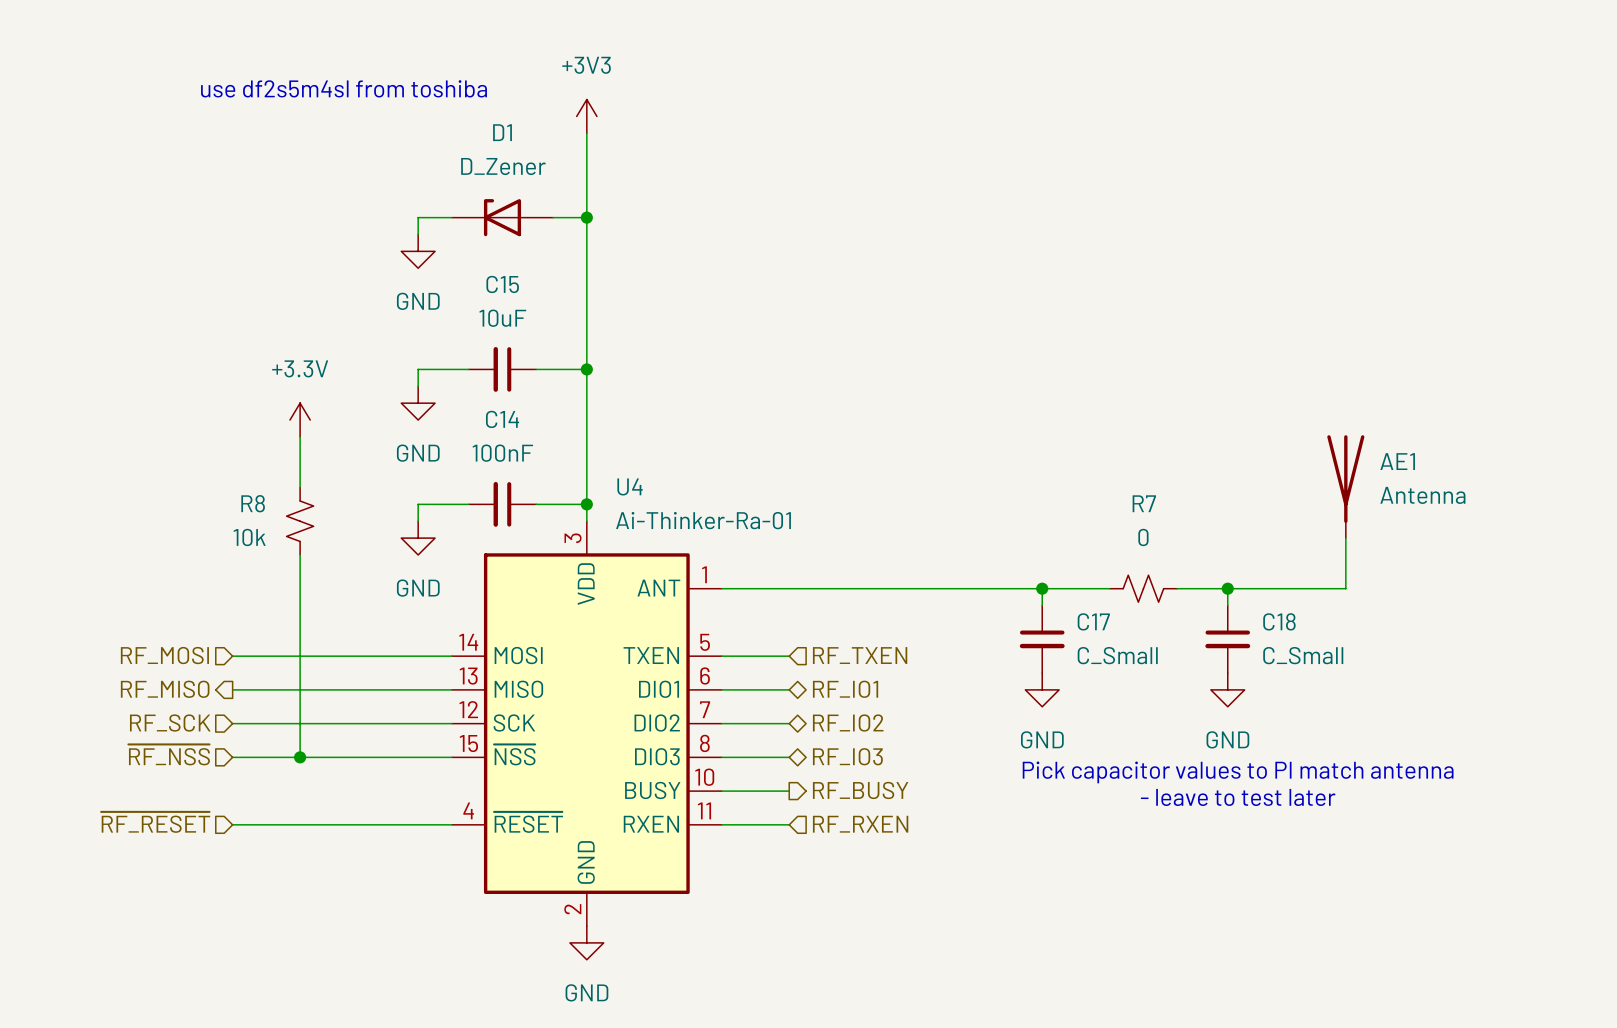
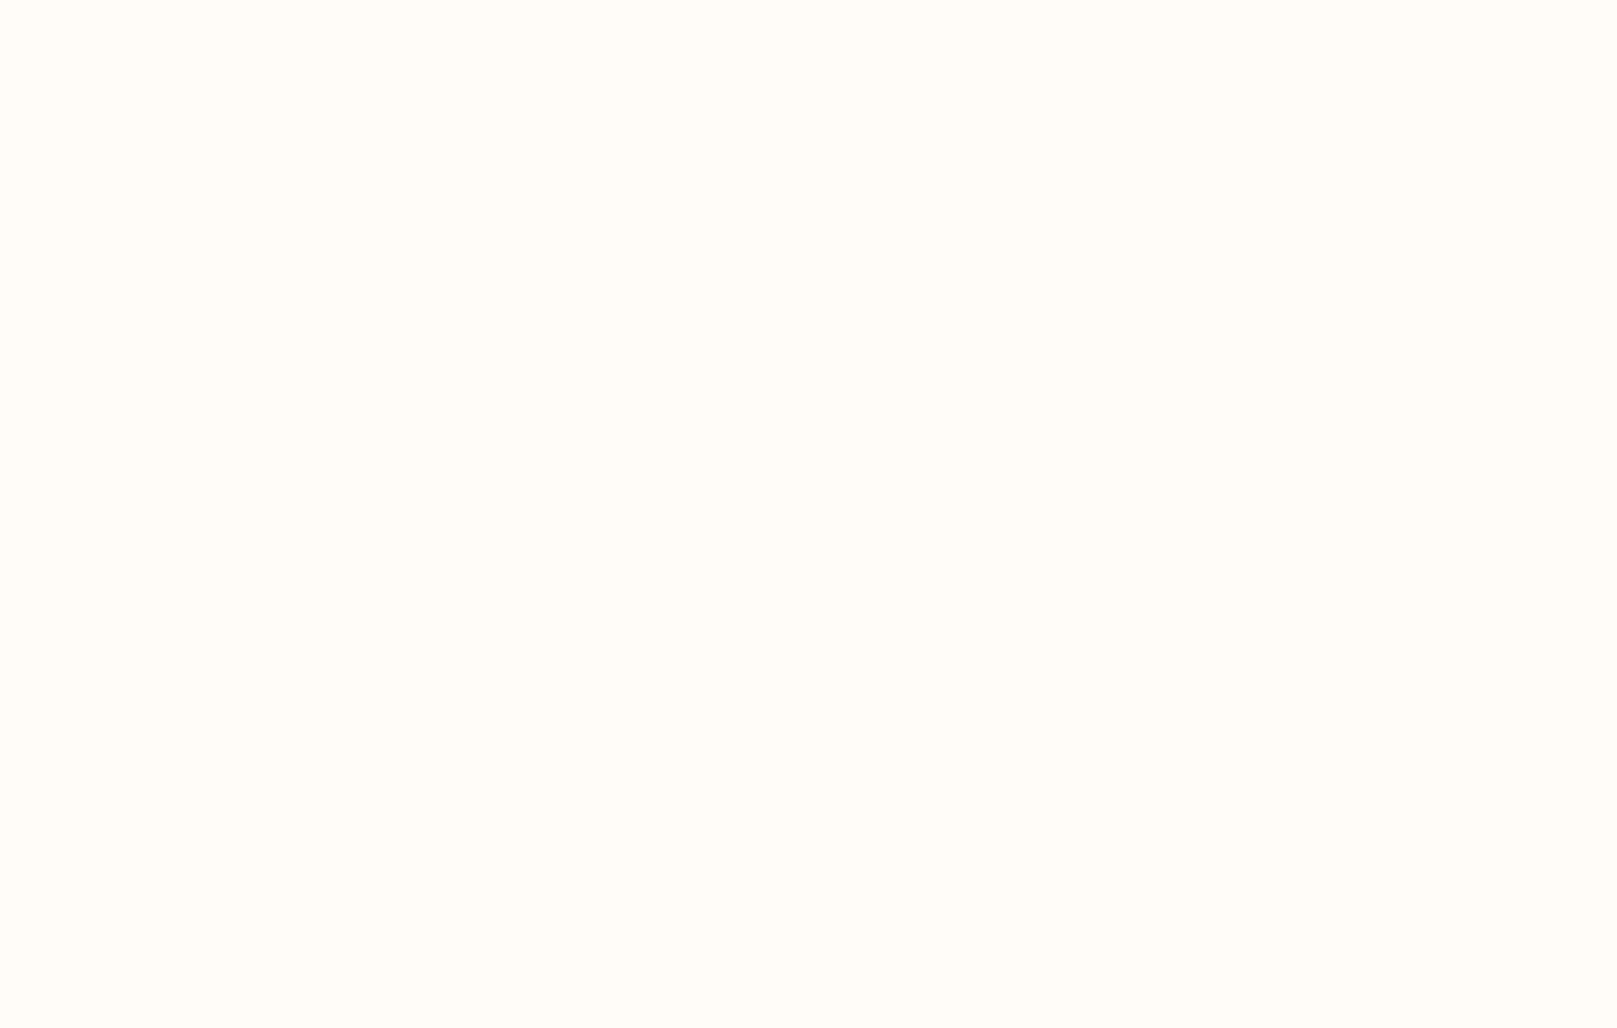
text: use df2s5m4sl from toshiba (344, 88) -> none
power symbol: +3V3 (586, 116) -> none
wire: (586, 133) (586, 521) -> none
wire: (451, 217) (418, 217) (418, 234) -> none
D1: D_Zener (502, 217) -> none
wire: (553, 217) (586, 217) -> none
junction: (586, 217) -> none
power symbol: GND (418, 251) -> none
wire: (468, 369) (418, 369) (418, 386) -> none
C15: 10uF (502, 369) -> none
wire: (536, 369) (586, 369) -> none
junction: (586, 369) -> none
power symbol: GND (418, 403) -> none
power symbol: +3.3V (300, 420) -> none
wire: (300, 436) (300, 487) -> none
AE1: Antenna (1345, 486) -> none
wire: (468, 504) (418, 504) (418, 521) -> none
C14: 100nF (502, 504) -> none
wire: (536, 504) (586, 504) -> none
junction: (586, 504) -> none
R8: 10k (300, 521) -> none
power symbol: GND (418, 538) -> none
wire: (1345, 538) (1345, 588) (1177, 588) -> none
wire: (300, 554) (300, 757) -> none
wire: (721, 588) (1109, 588) -> none
wire: (1042, 588) (1042, 605) -> none
junction: (1042, 588) -> none
R7: 0 (1143, 588) -> none
wire: (1227, 588) (1227, 605) -> none
junction: (1227, 588) -> none
C17: C_Small (1042, 639) -> none
C18: C_Small (1227, 639) -> none
hierarchical label: RF_MOSI (164, 655) -> none
hierarchical label: RF_TXEN (860, 655) -> none
wire: (232, 656) (451, 656) -> none
wire: (721, 656) (789, 656) -> none
hierarchical label: RF_MISO (165, 689) -> none
wire: (232, 689) (451, 689) -> none
wire: (721, 689) (789, 689) -> none
hierarchical label: RF_IO1 (845, 689) -> none
power symbol: GND (1042, 689) -> none
power symbol: GND (1227, 689) -> none
hierarchical label: RF_SCK (170, 723) -> none
wire: (232, 723) (451, 723) -> none
U4: Ai-Thinker-Ra-01 (586, 723) -> none
wire: (721, 723) (789, 723) -> none
hierarchical label: RF_IO2 (848, 723) -> none
hierarchical label: ~{RF_NSS} (169, 754) -> none
hierarchical label: RF_IO3 (847, 756) -> none
wire: (232, 757) (451, 757) -> none
junction: (300, 757) -> none
wire: (721, 757) (789, 757) -> none
text: Pick capacitor values to PI match antenna (1238, 772) -> none
hierarchical label: RF_BUSY (860, 790) -> none
wire: (721, 791) (789, 791) -> none
text: - leave to test later (1238, 797) -> none
hierarchical label: ~{RF_RESET} (155, 822) -> none
wire: (232, 824) (451, 824) -> none
wire: (721, 824) (789, 824) -> none
hierarchical label: RF_RXEN (860, 824) -> none
power symbol: GND (586, 942) -> none

